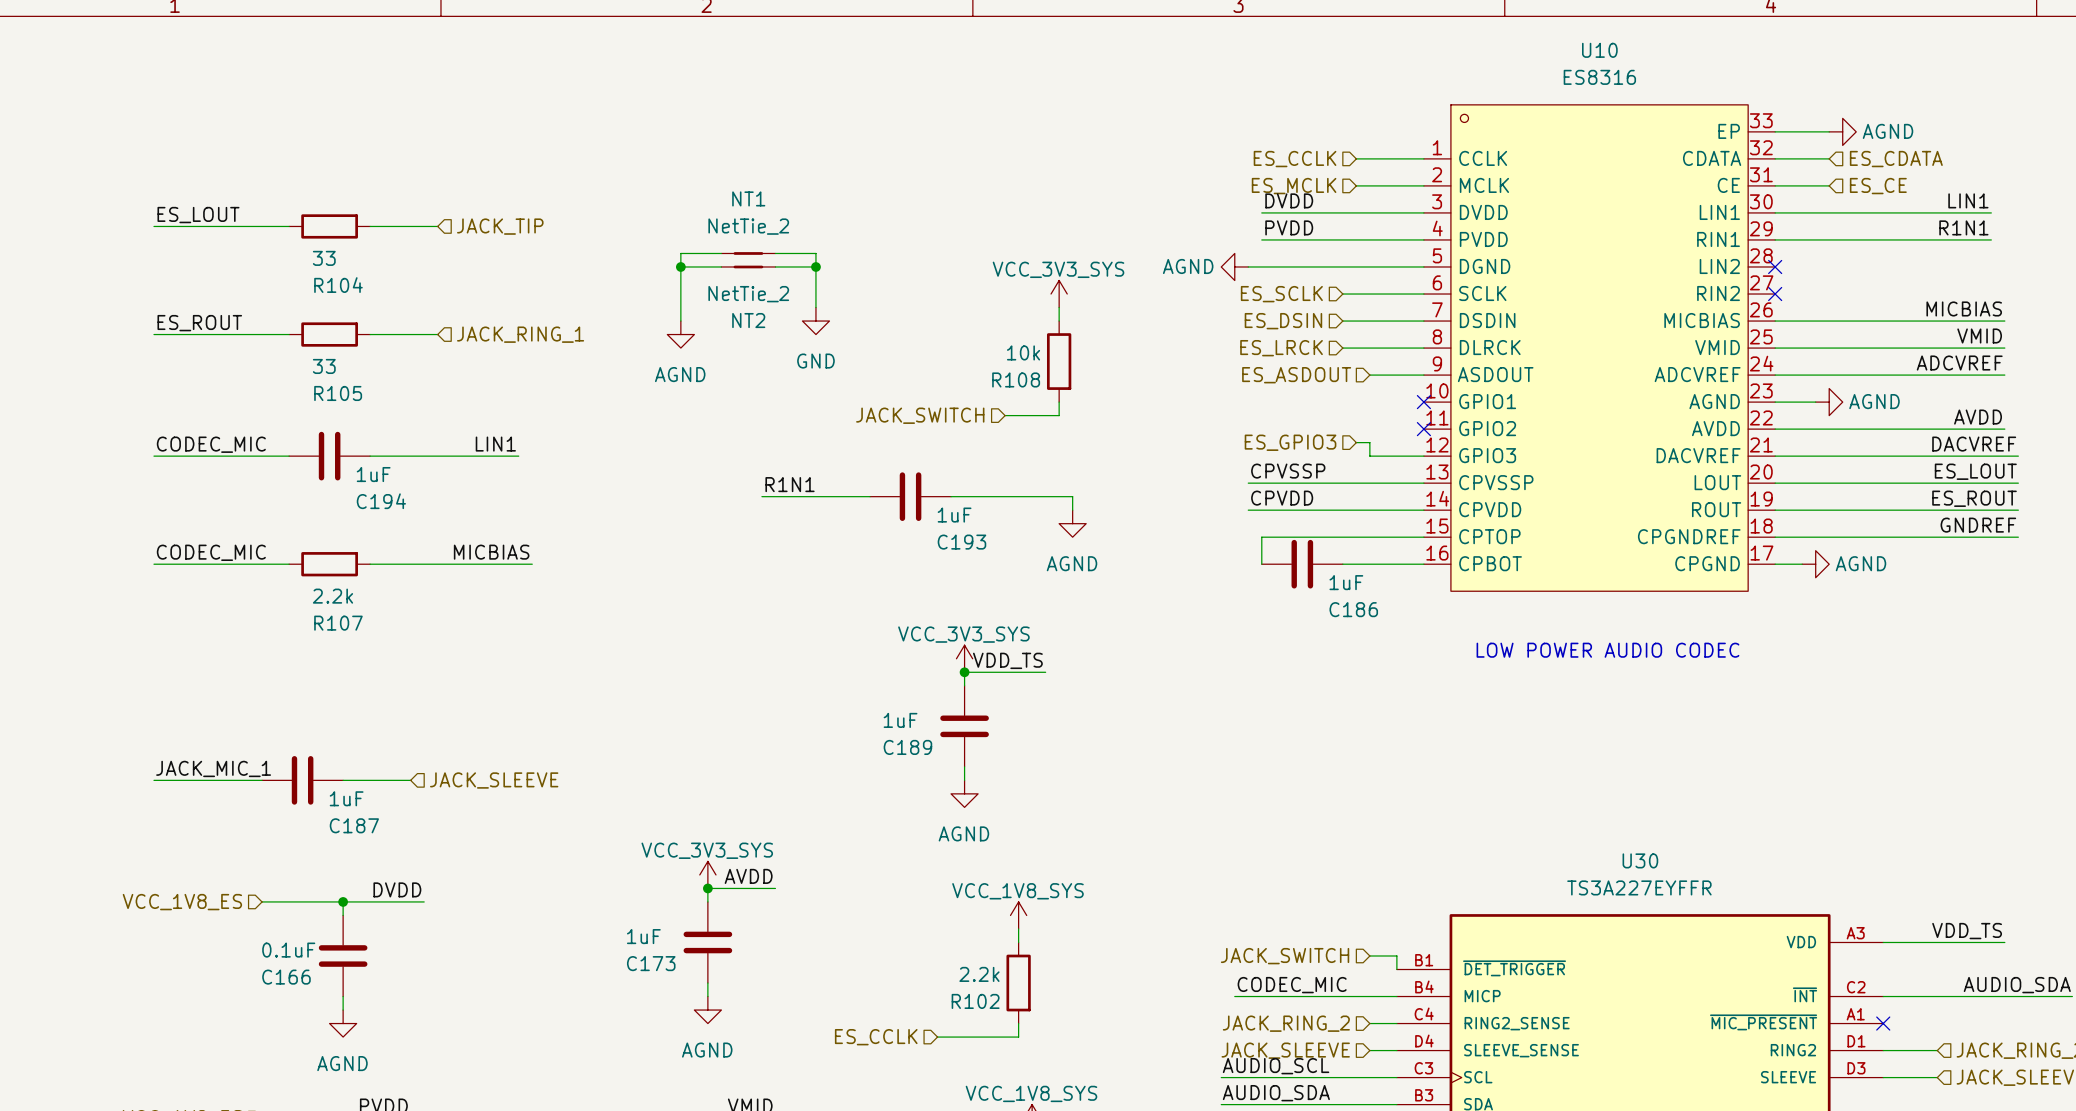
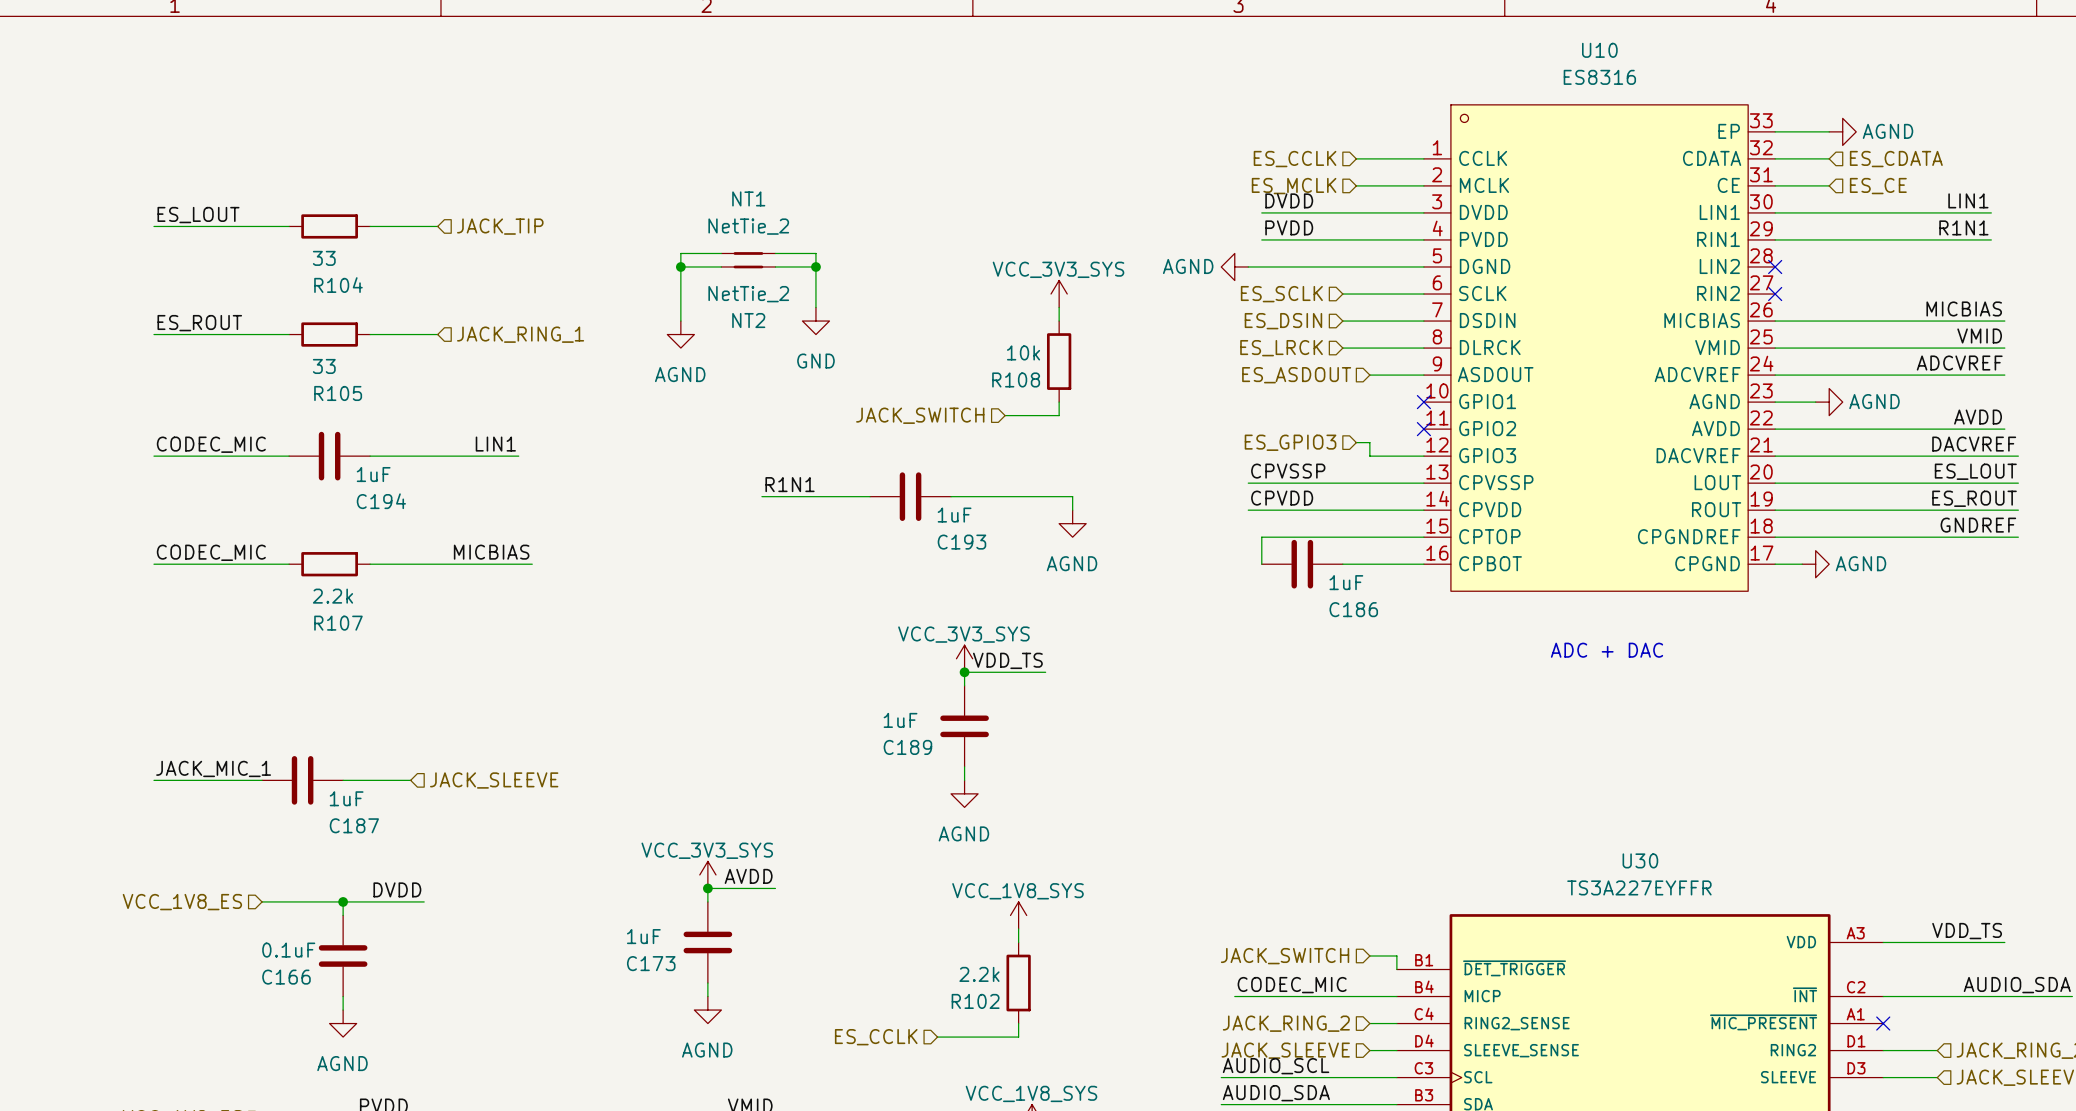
text: LOW POWER AUDIO CODEC (1607, 650) -> ADC + DAC (1607, 650)

